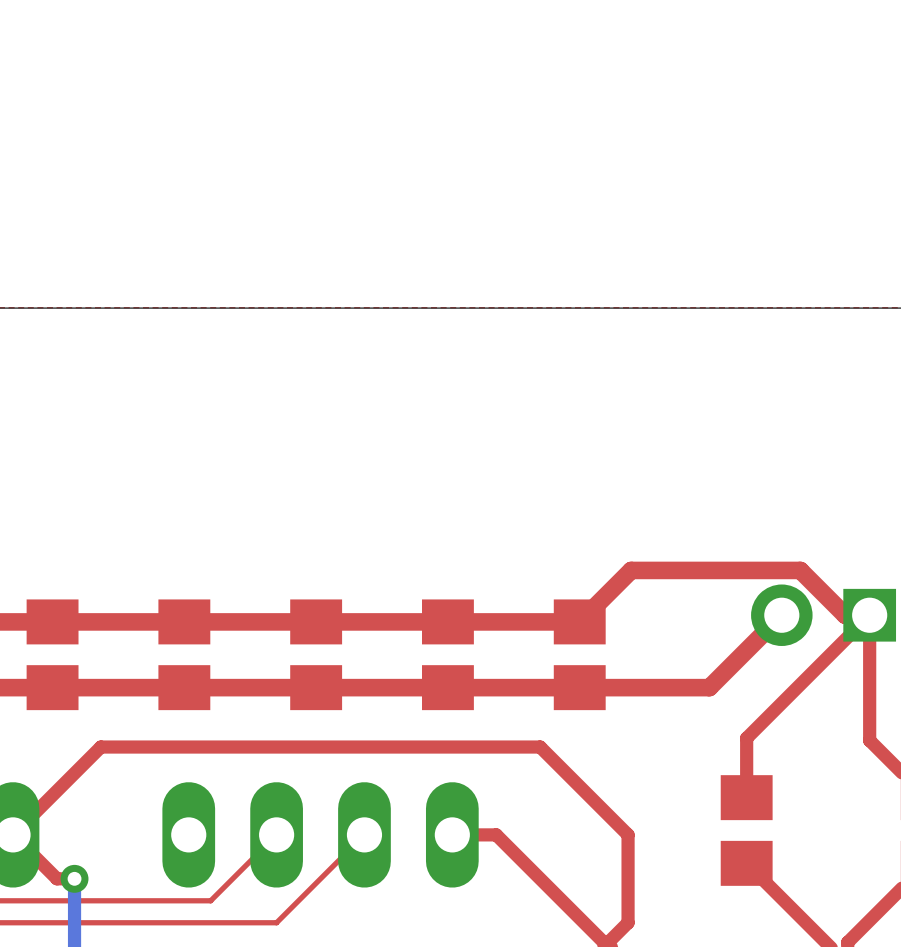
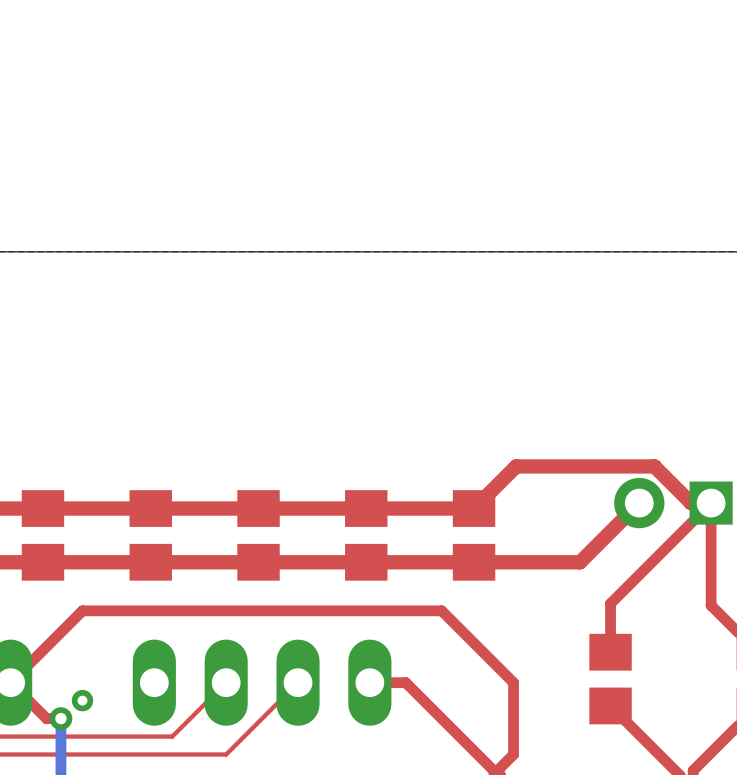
via: none -> (82, 700)

